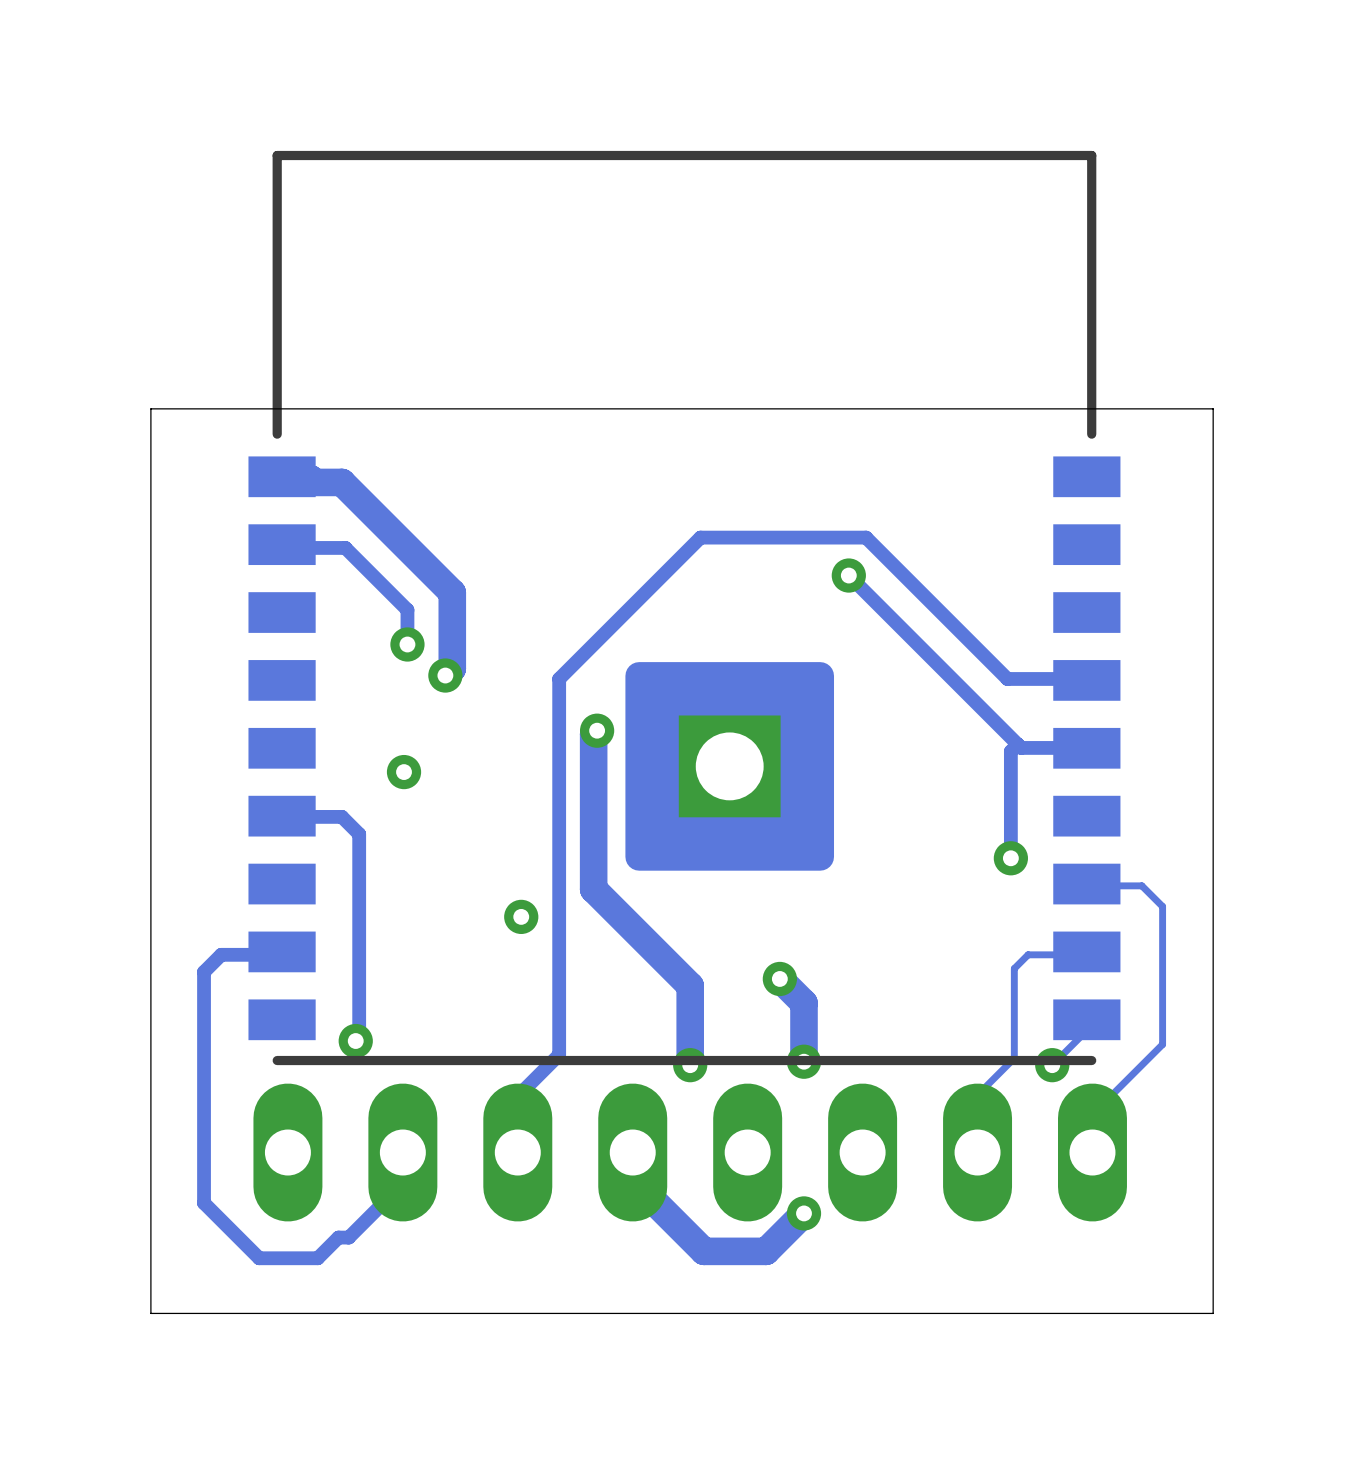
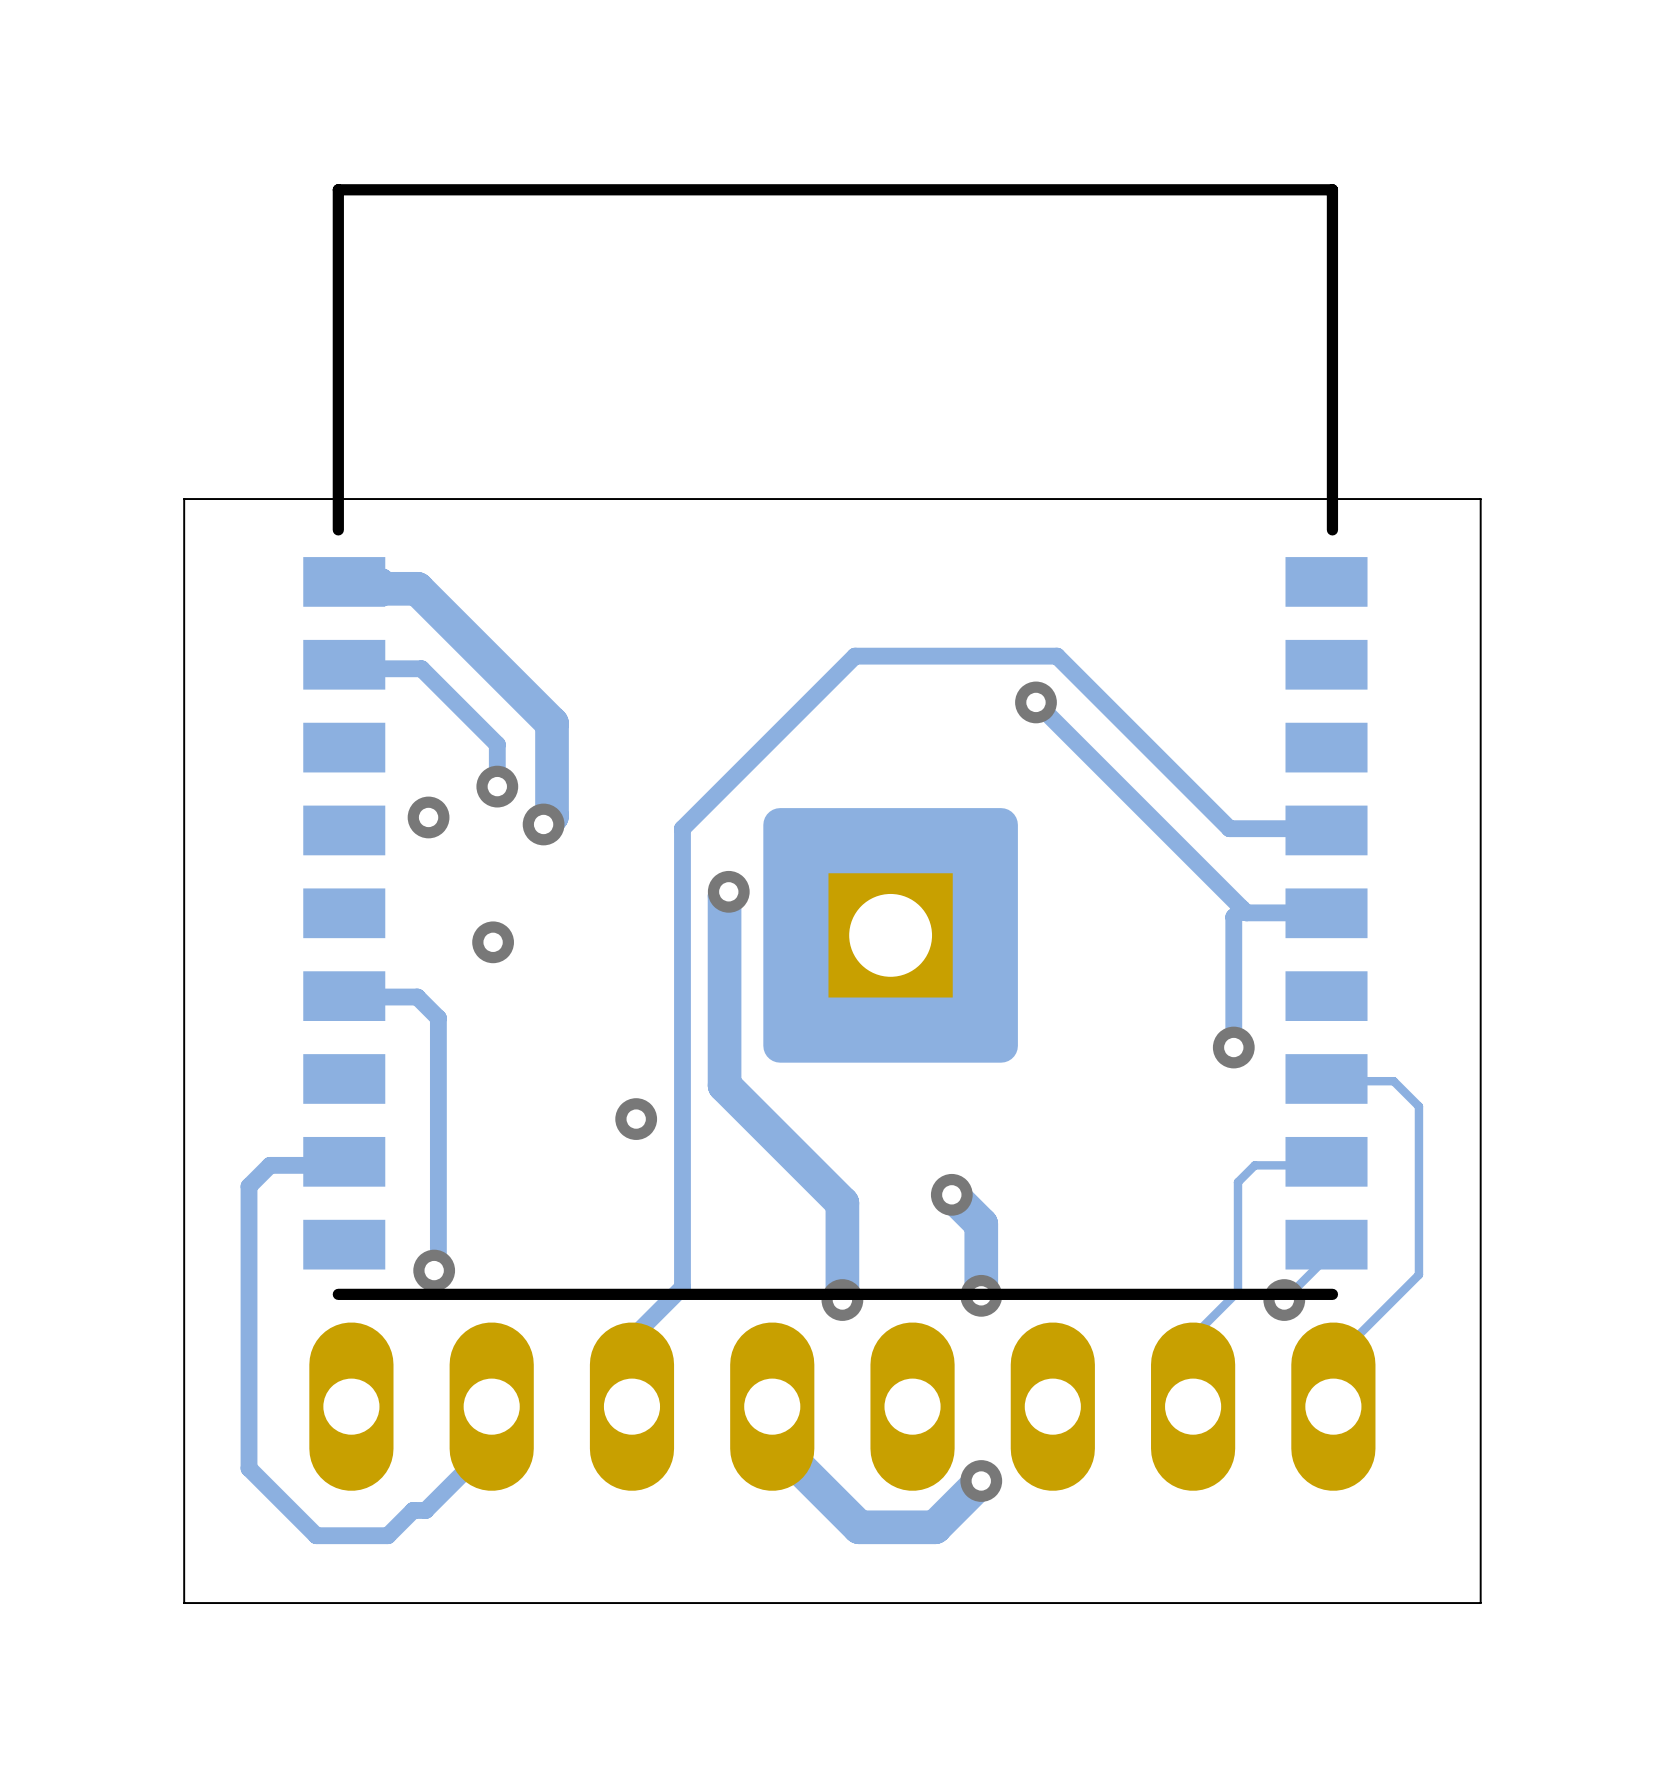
via: none -> (428, 817)

